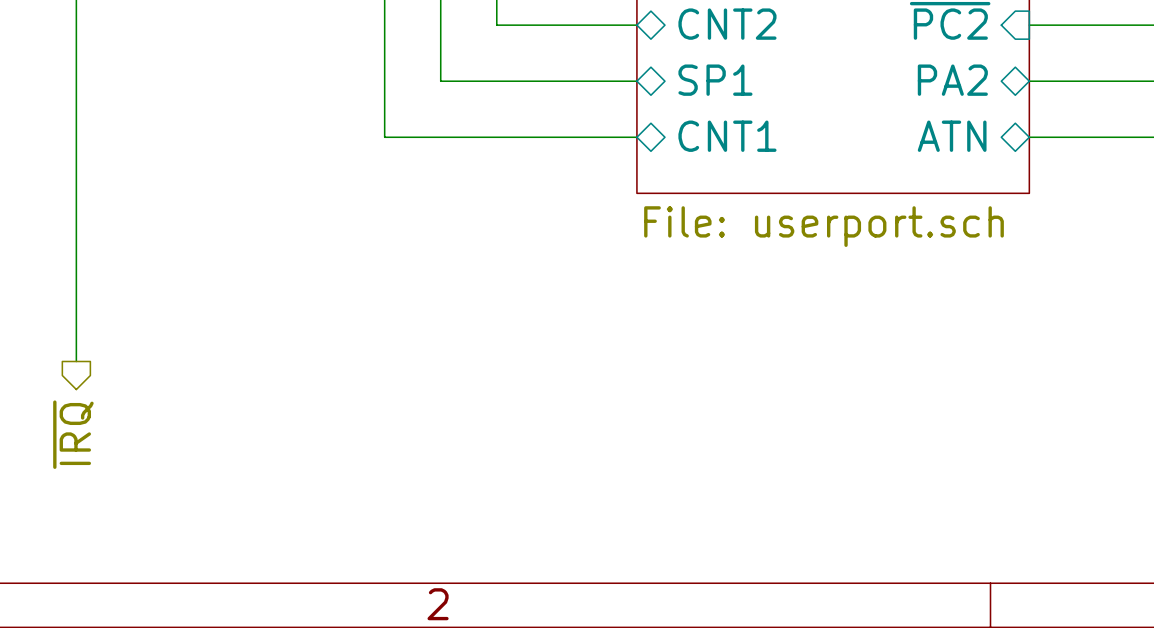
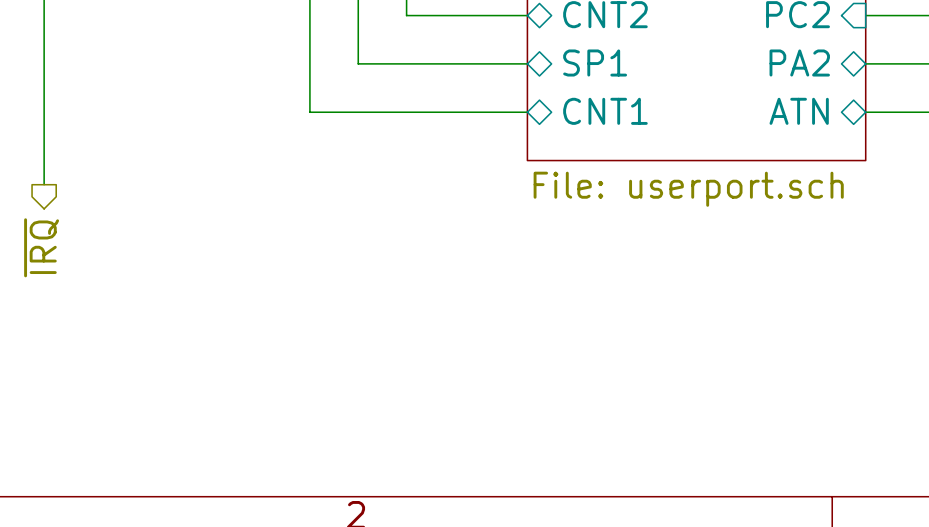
wire: (76, 221) (76, 361) -> none
hierarchical label position: ~{IRQ} (73, 434) -> ~{IRQ} (41, 247)

